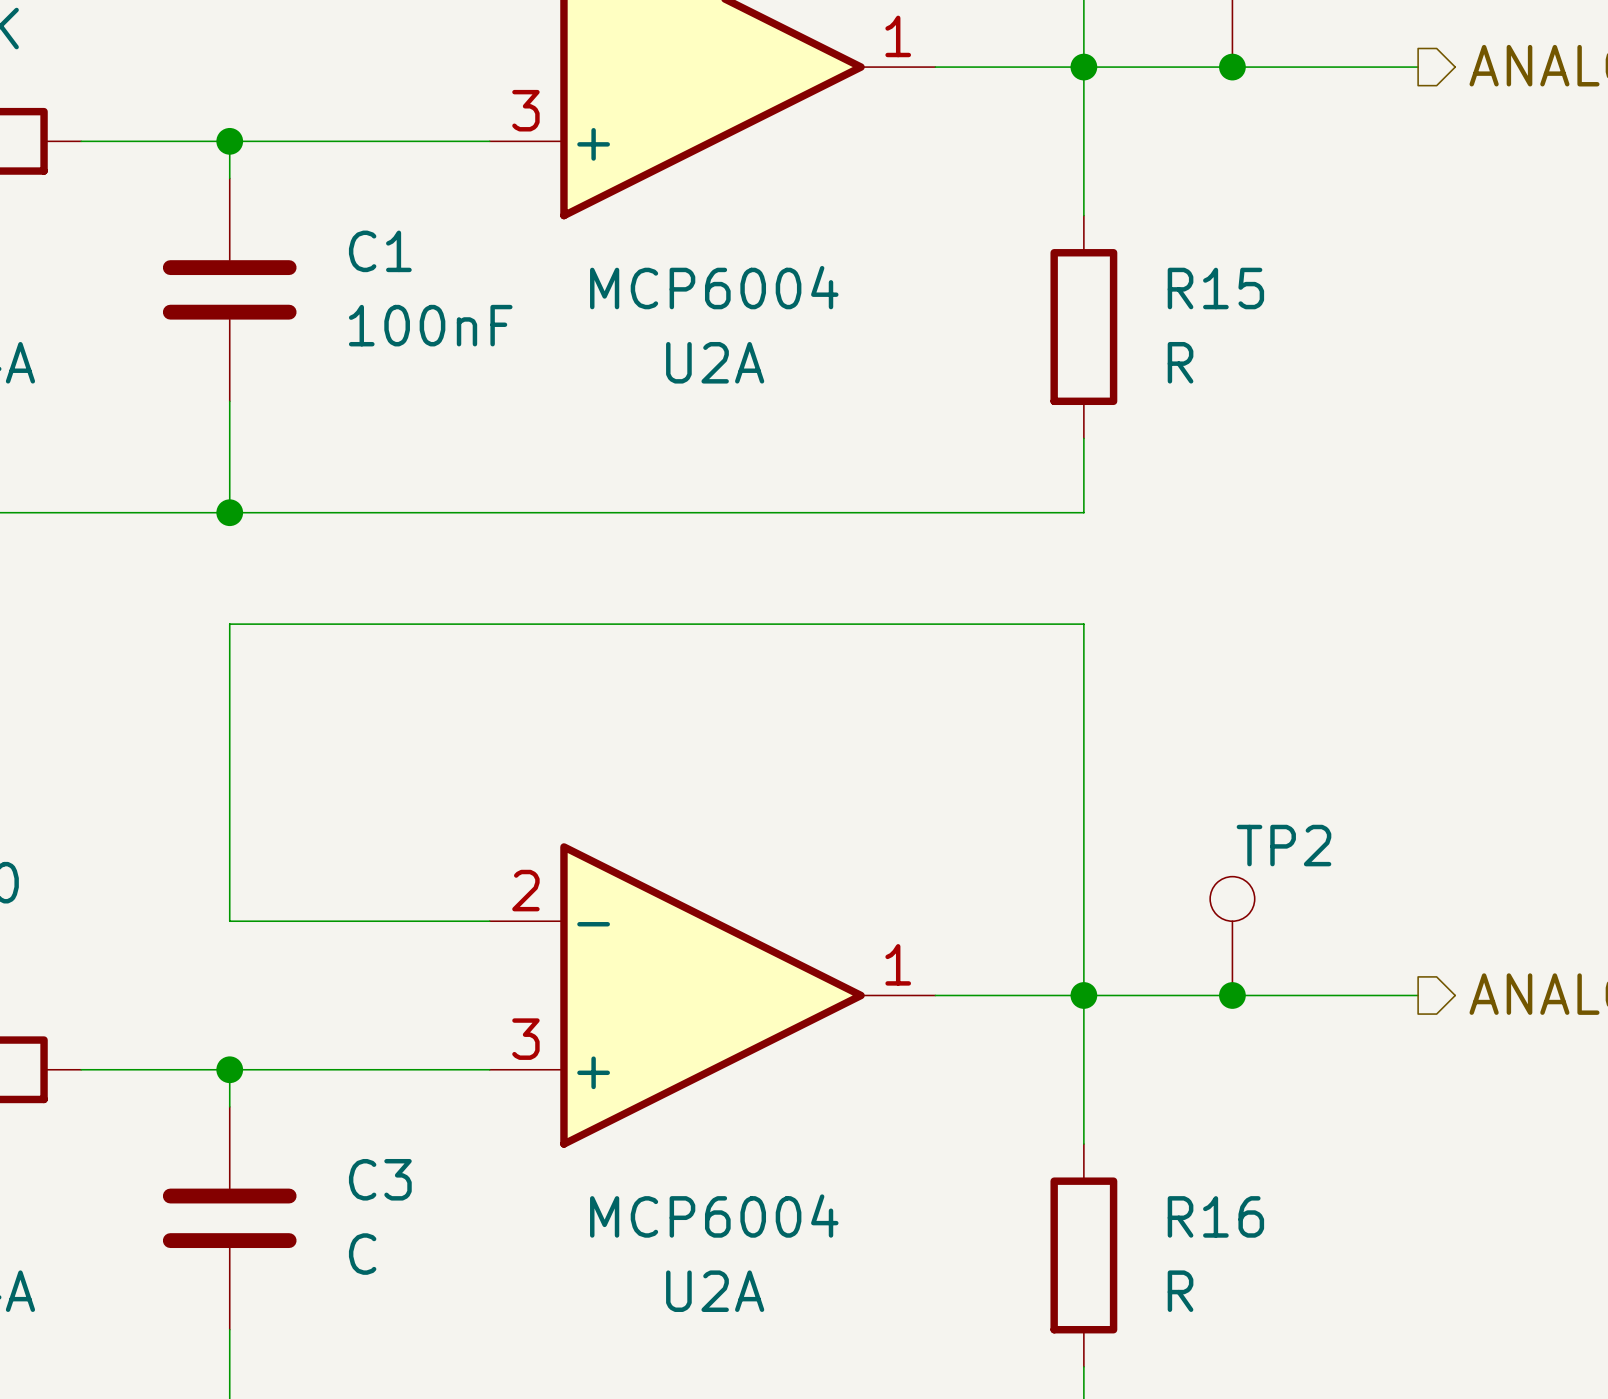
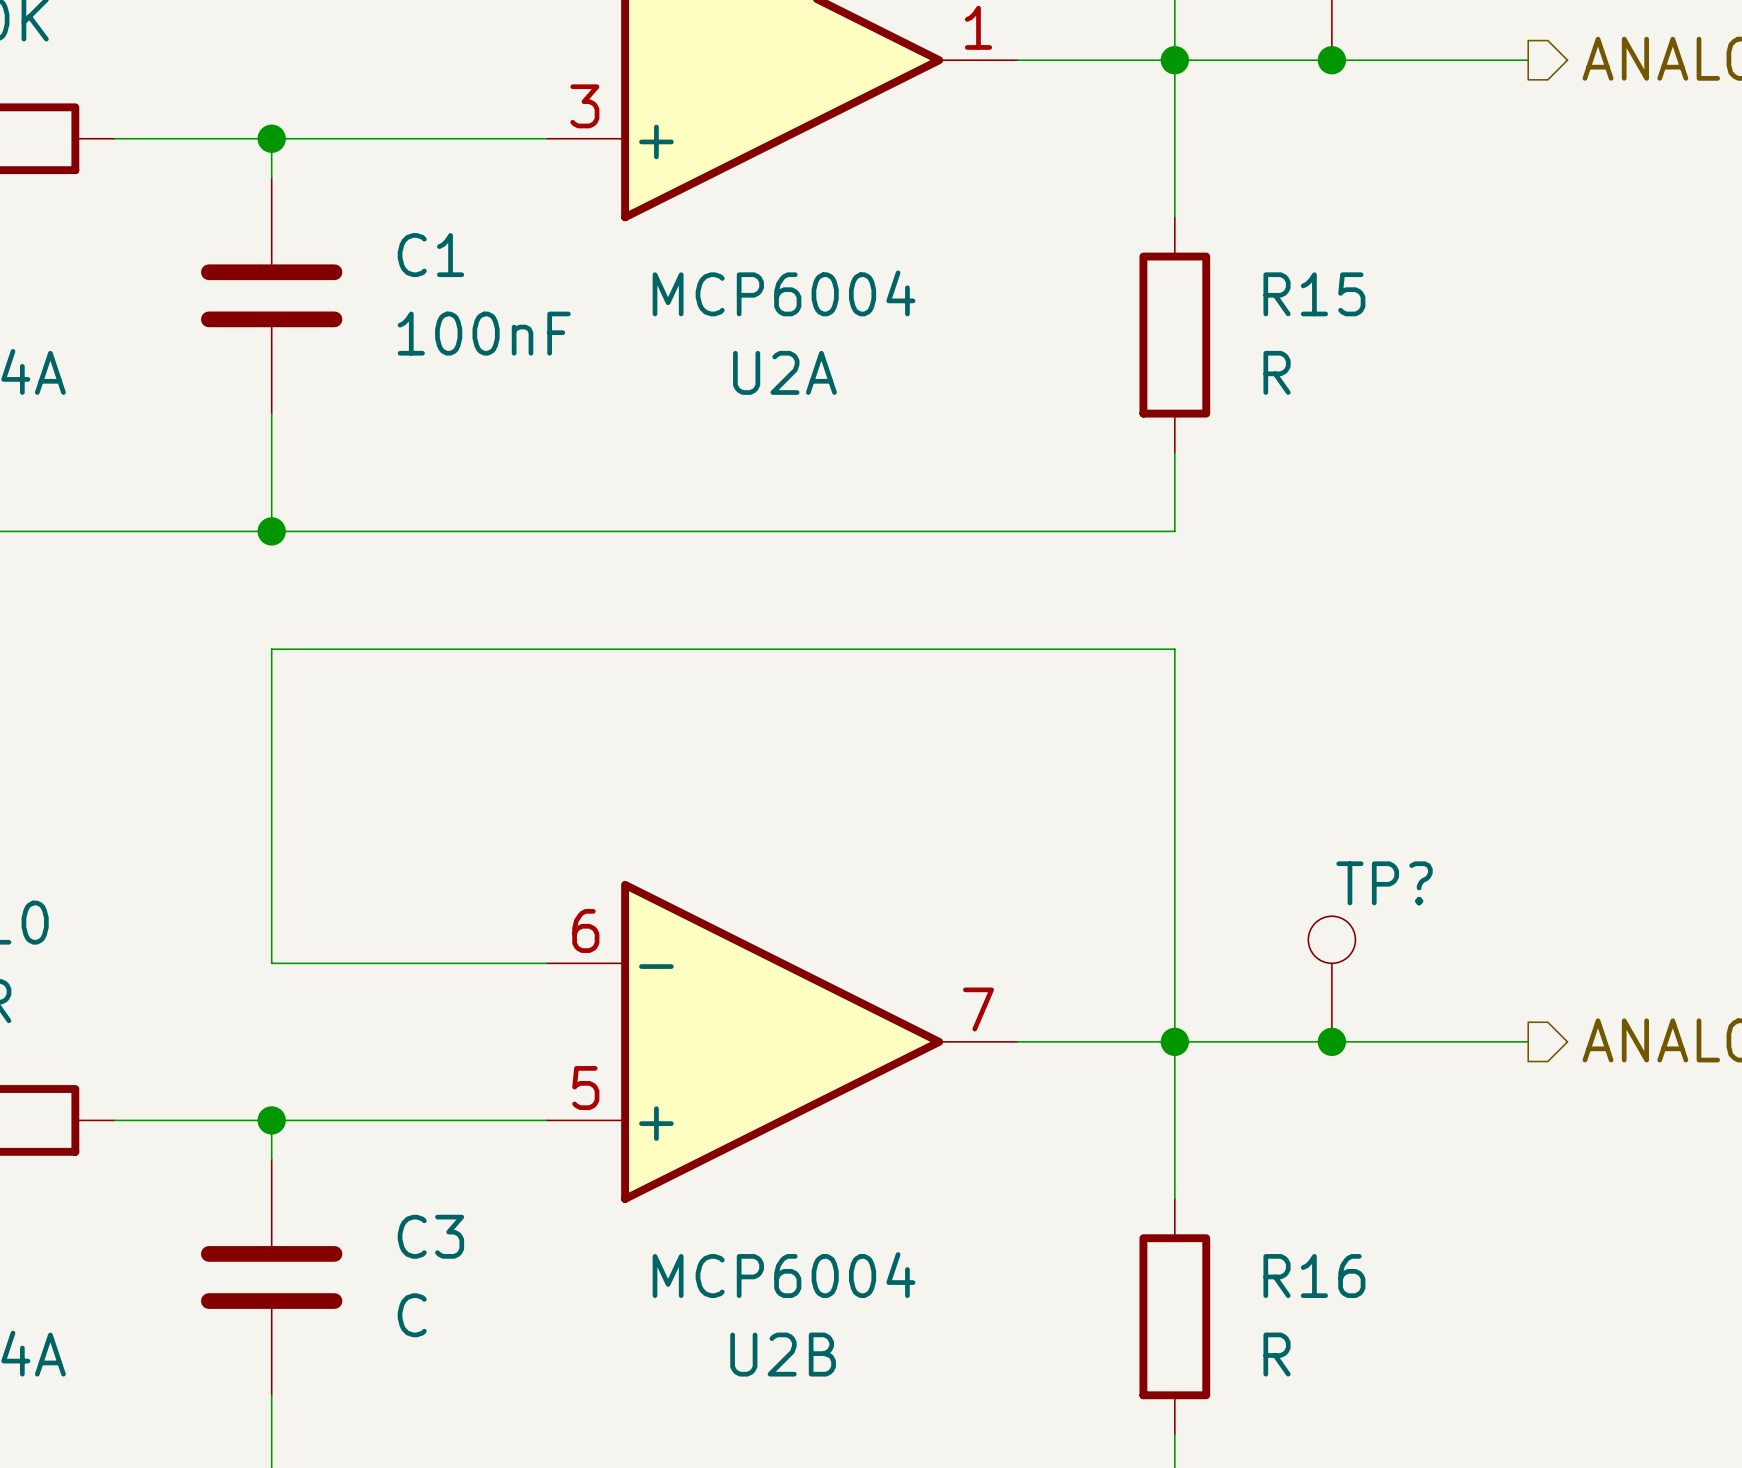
TP2 name: TP2 (1283, 845) -> TP? (1384, 883)
U2A pin number: 2 (525, 890) -> 6 (585, 930)
U2A pin number: 1 (898, 964) -> 7 (978, 1009)
U2A pin number: 3 (525, 1039) -> 5 (585, 1088)
U2A name: U2A (715, 1291) -> U2B (783, 1354)

